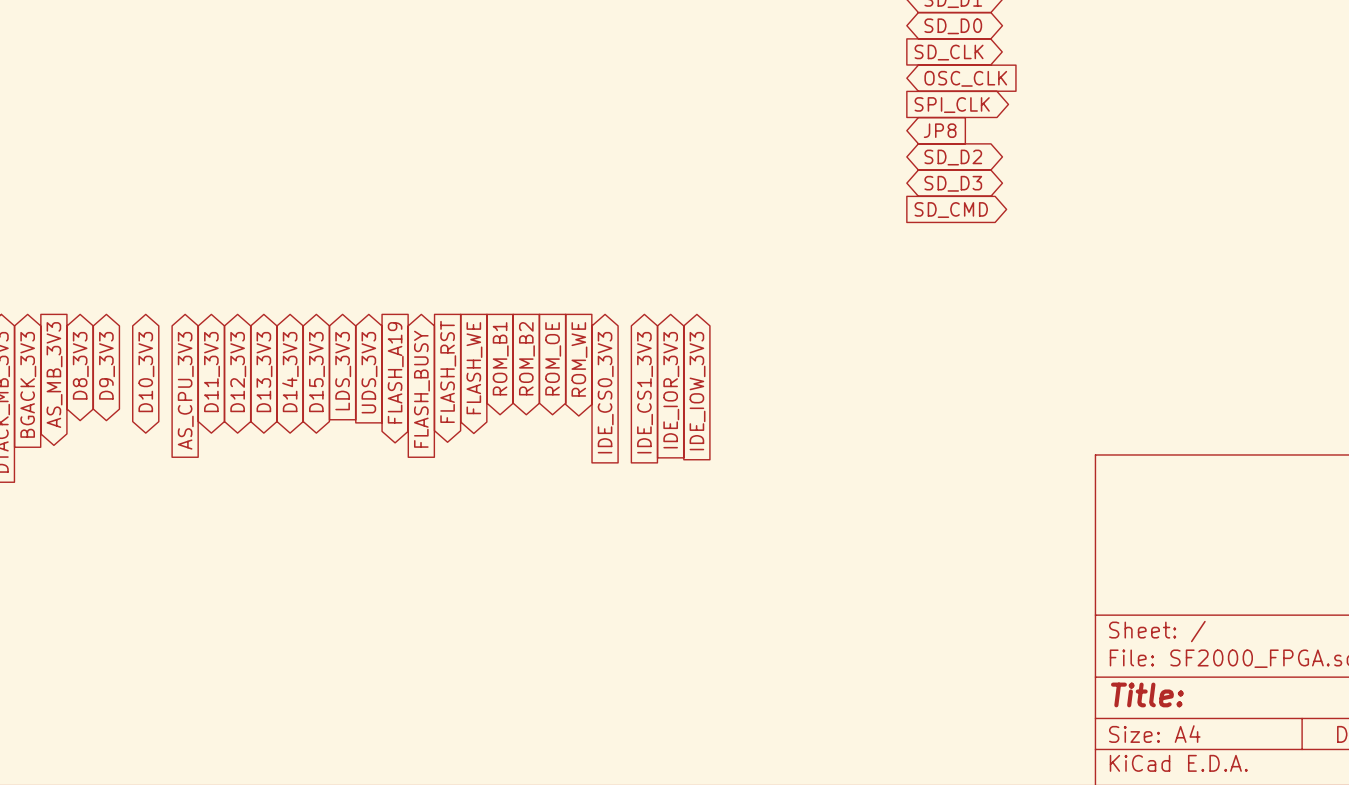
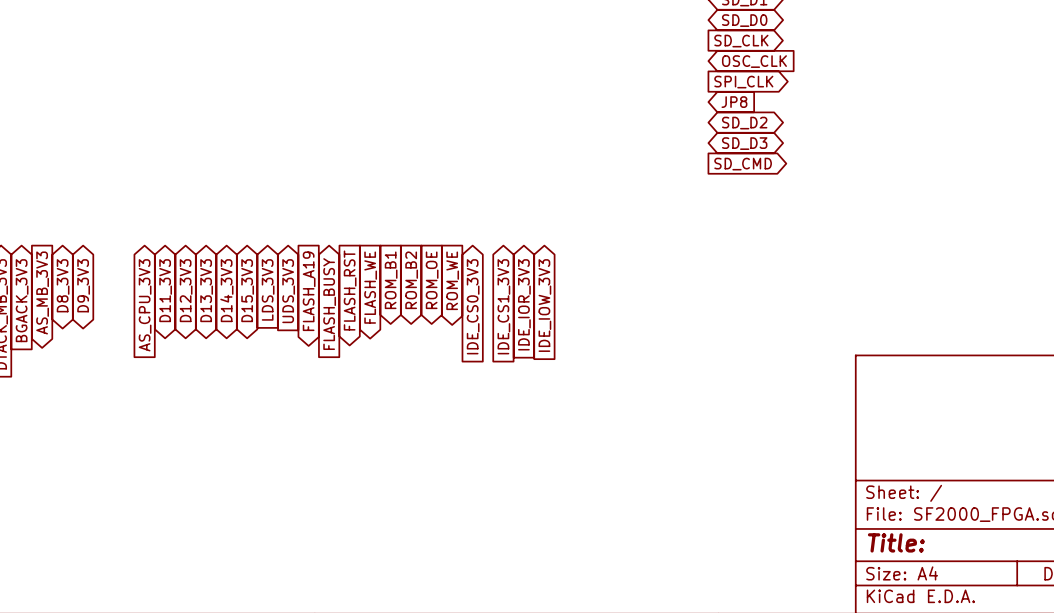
global label: D10_3V3 (146, 372) -> none

